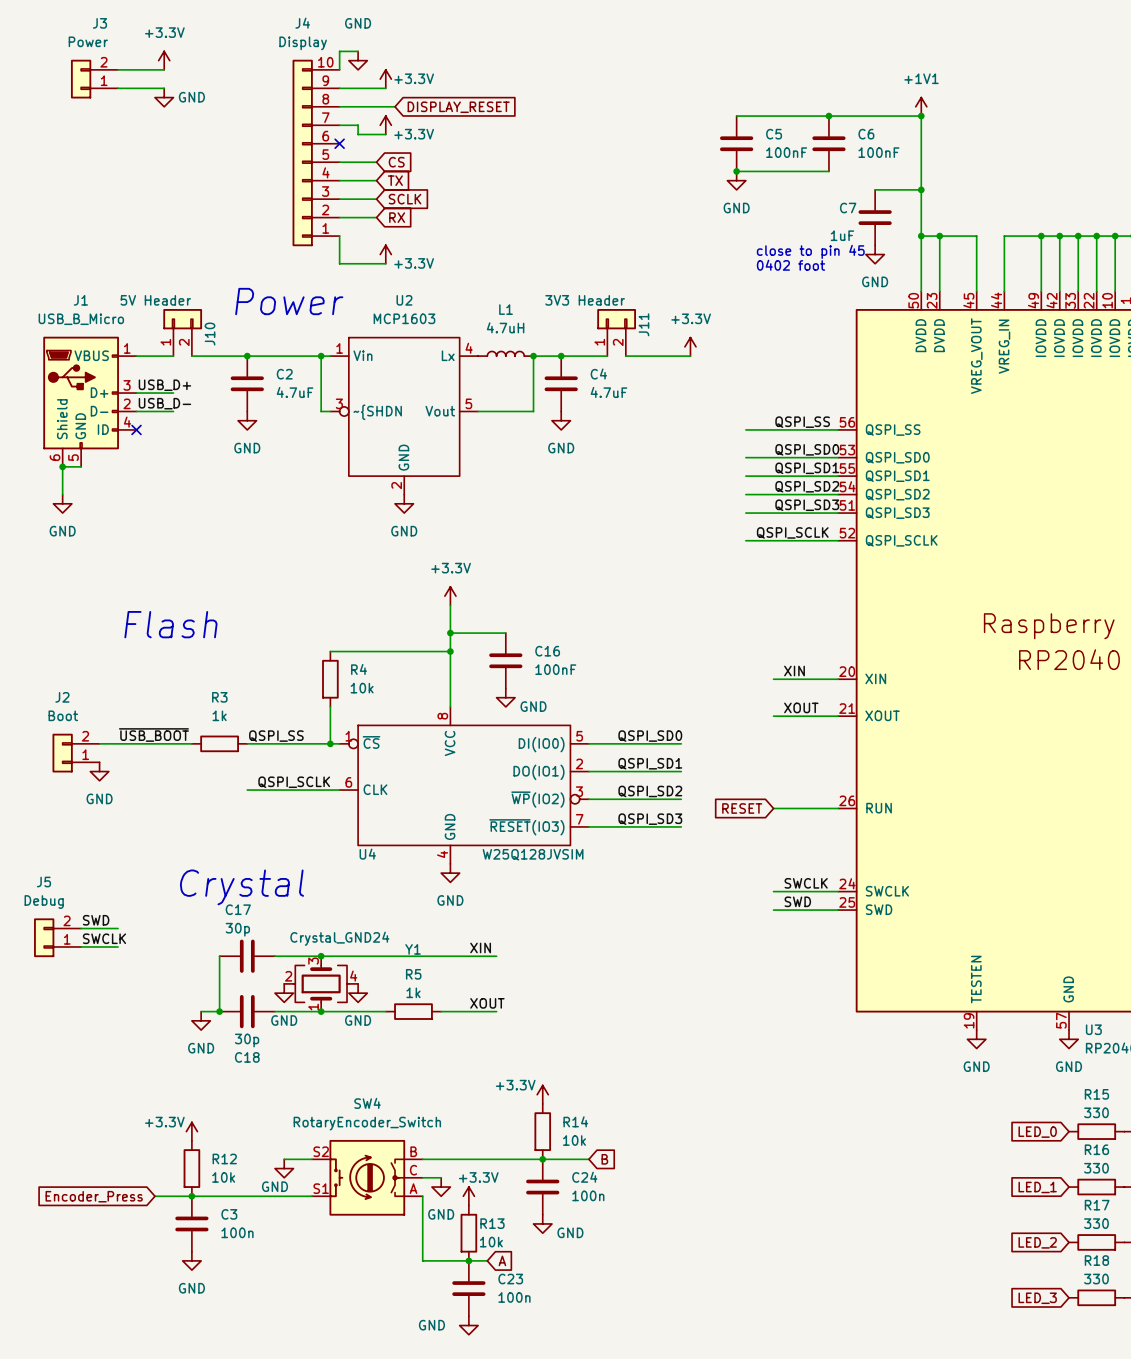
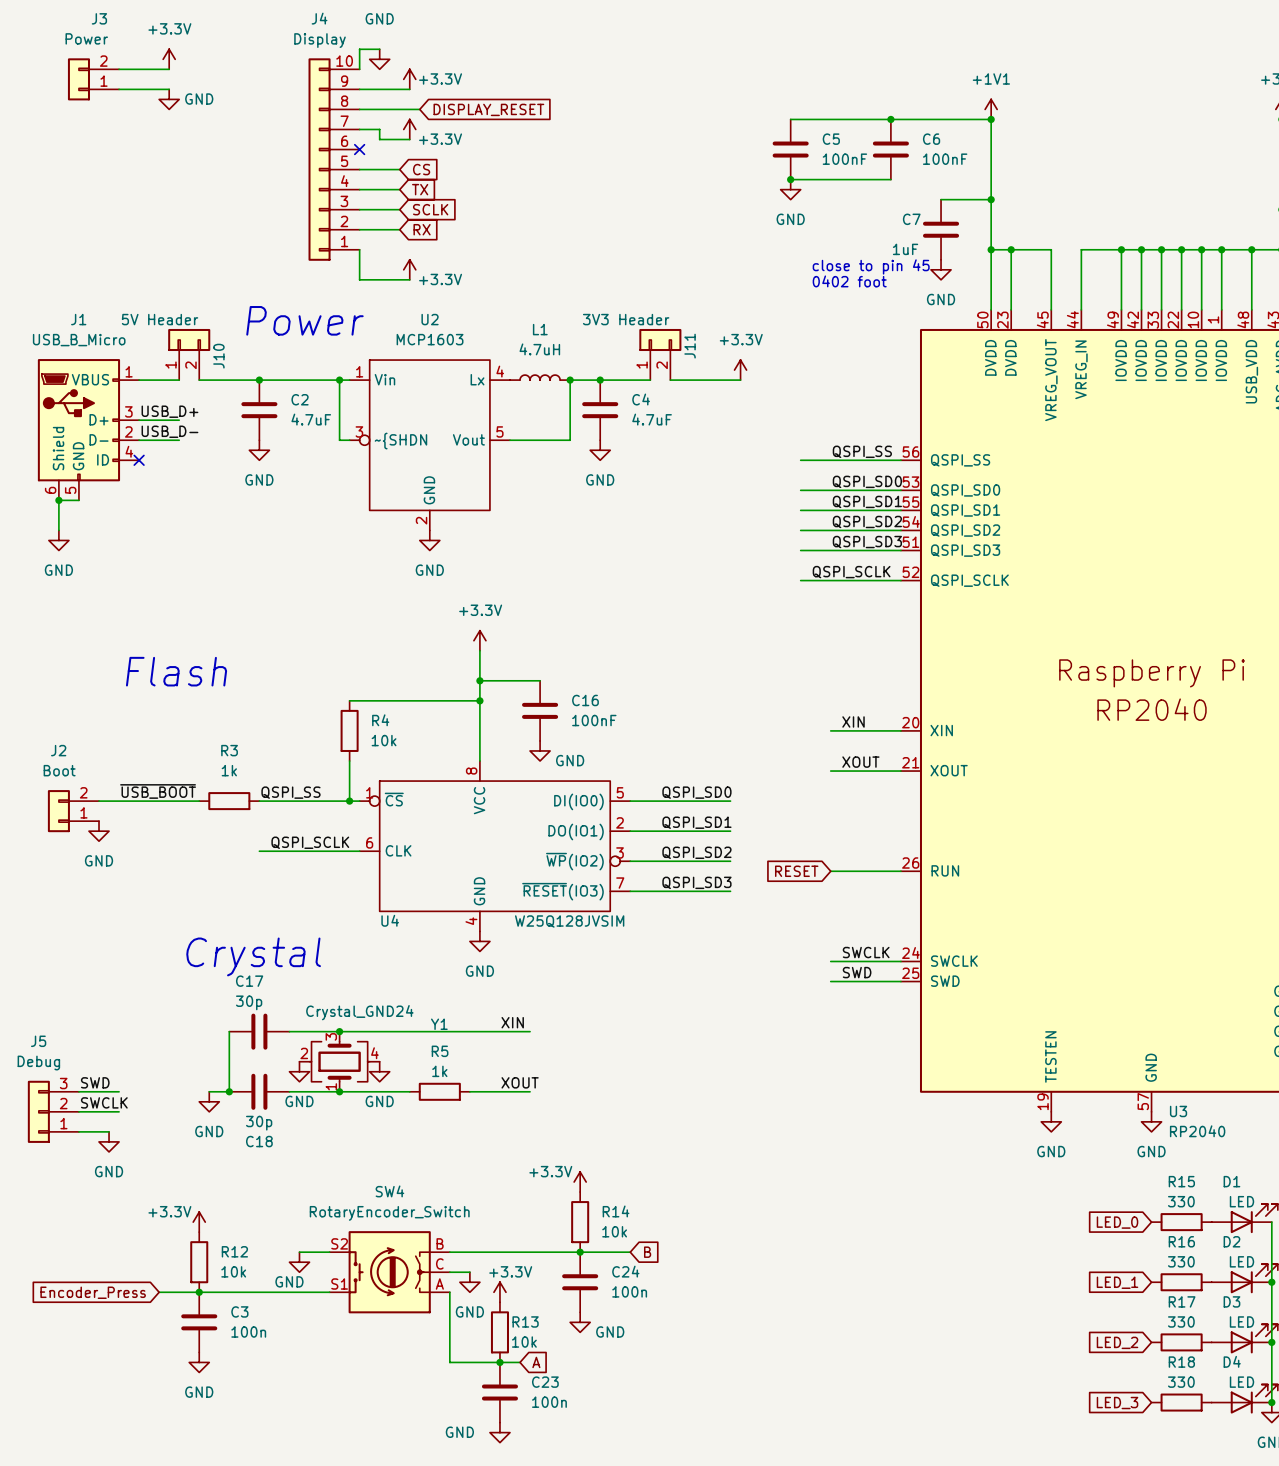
J5 symbol: [34, 918, 82, 958] -> [27, 1080, 79, 1143]
label position: SWD (96, 920) -> SWD (95, 1082)
wire: (81, 928) (118, 928) -> (78, 1091) (119, 1091)
label position: SWCLK (104, 938) -> SWCLK (104, 1102)
wire: (81, 946) (118, 946) -> (78, 1111) (119, 1111)
wire: none -> (78, 1131) (109, 1131)
power symbol: none -> GND (109, 1141)

